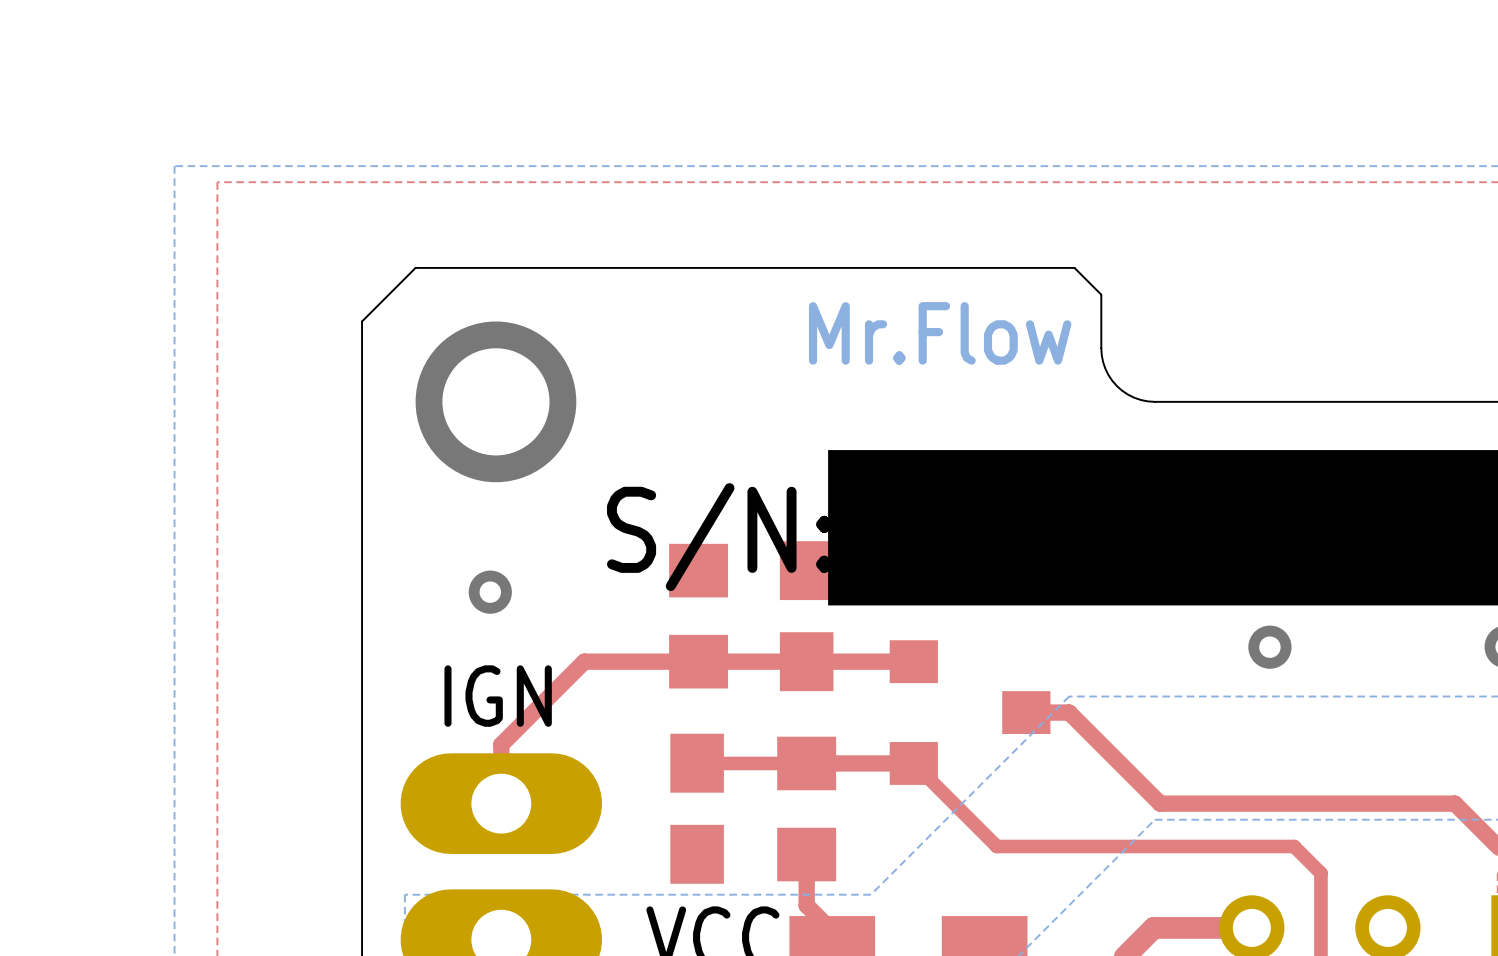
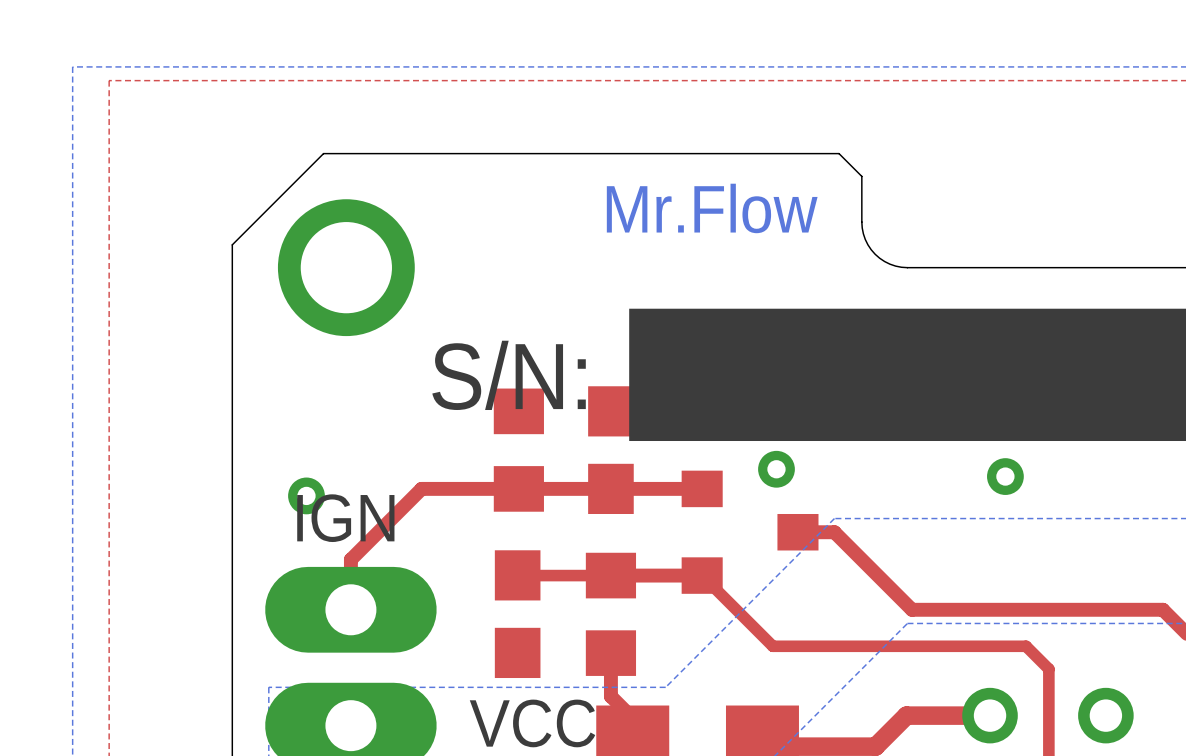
board edge: (469, 267) (415, 267) (362, 321) (362, 375) -> (323, 153) (232, 244)
via position: (490, 592) -> (306, 495)
via: none -> (776, 469)

